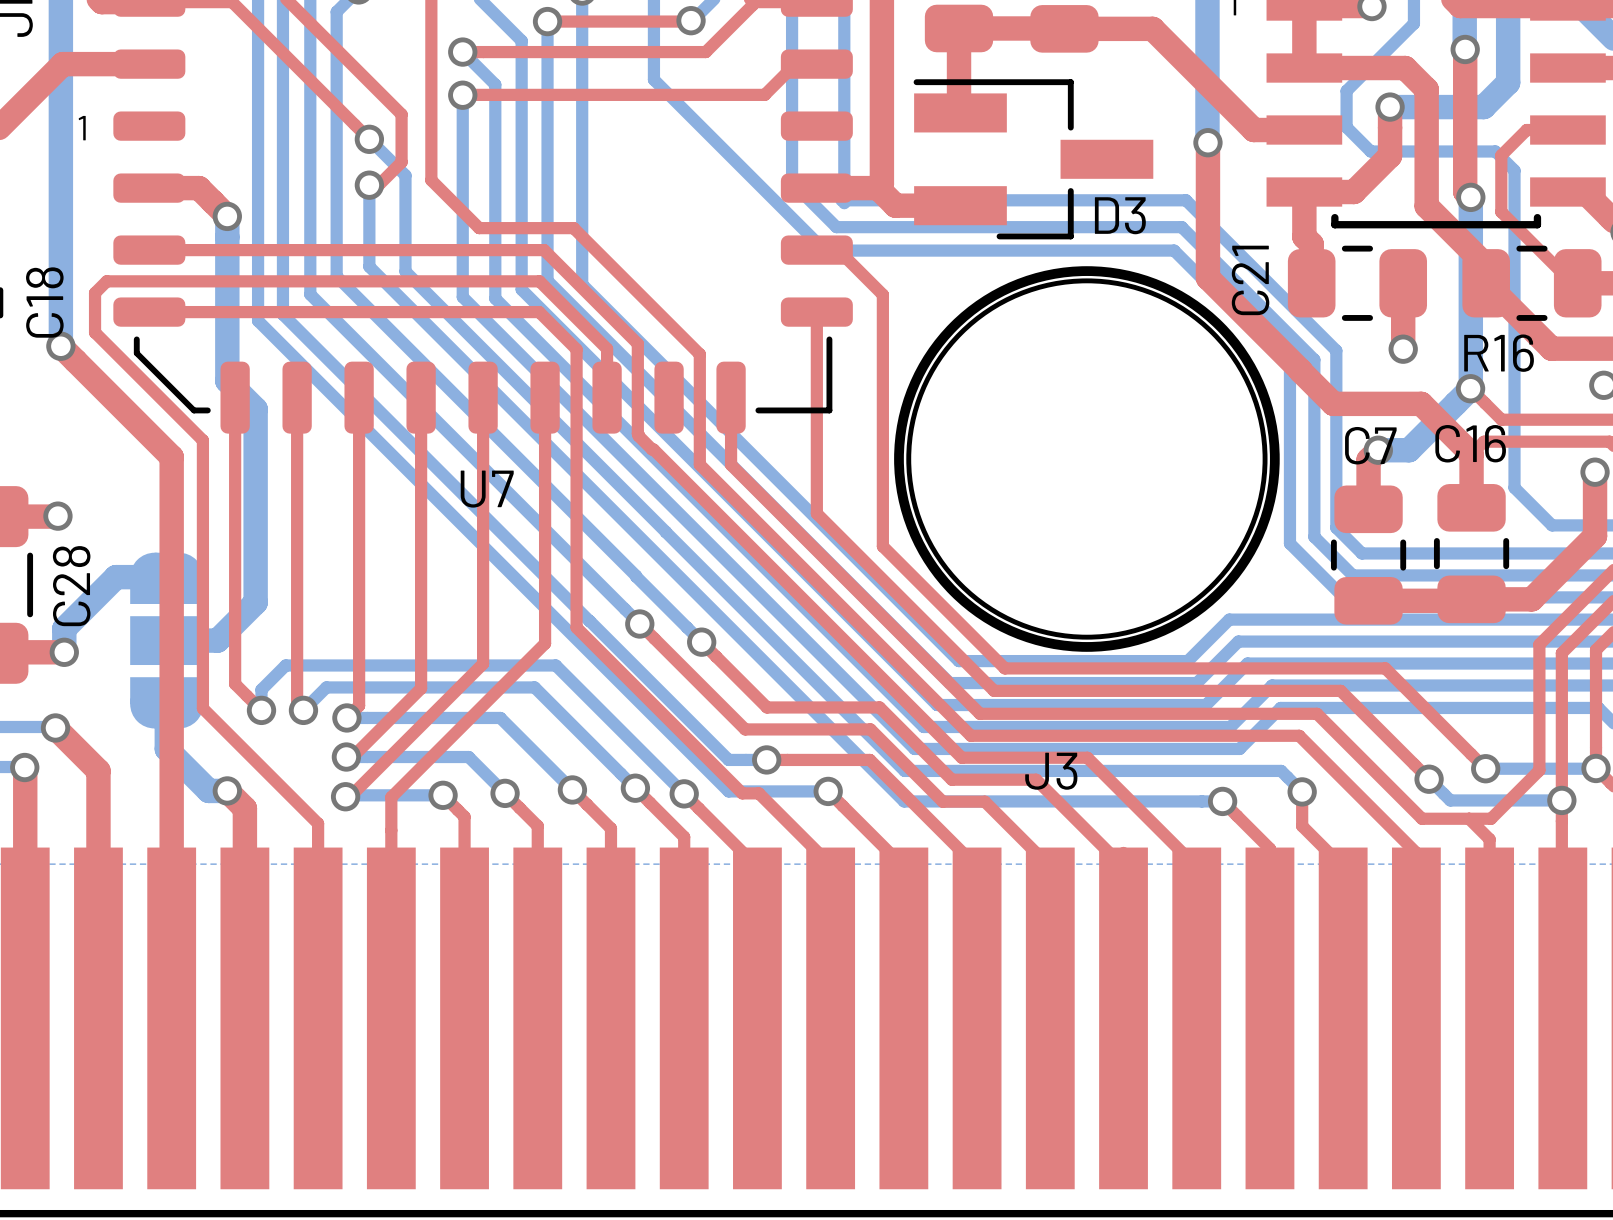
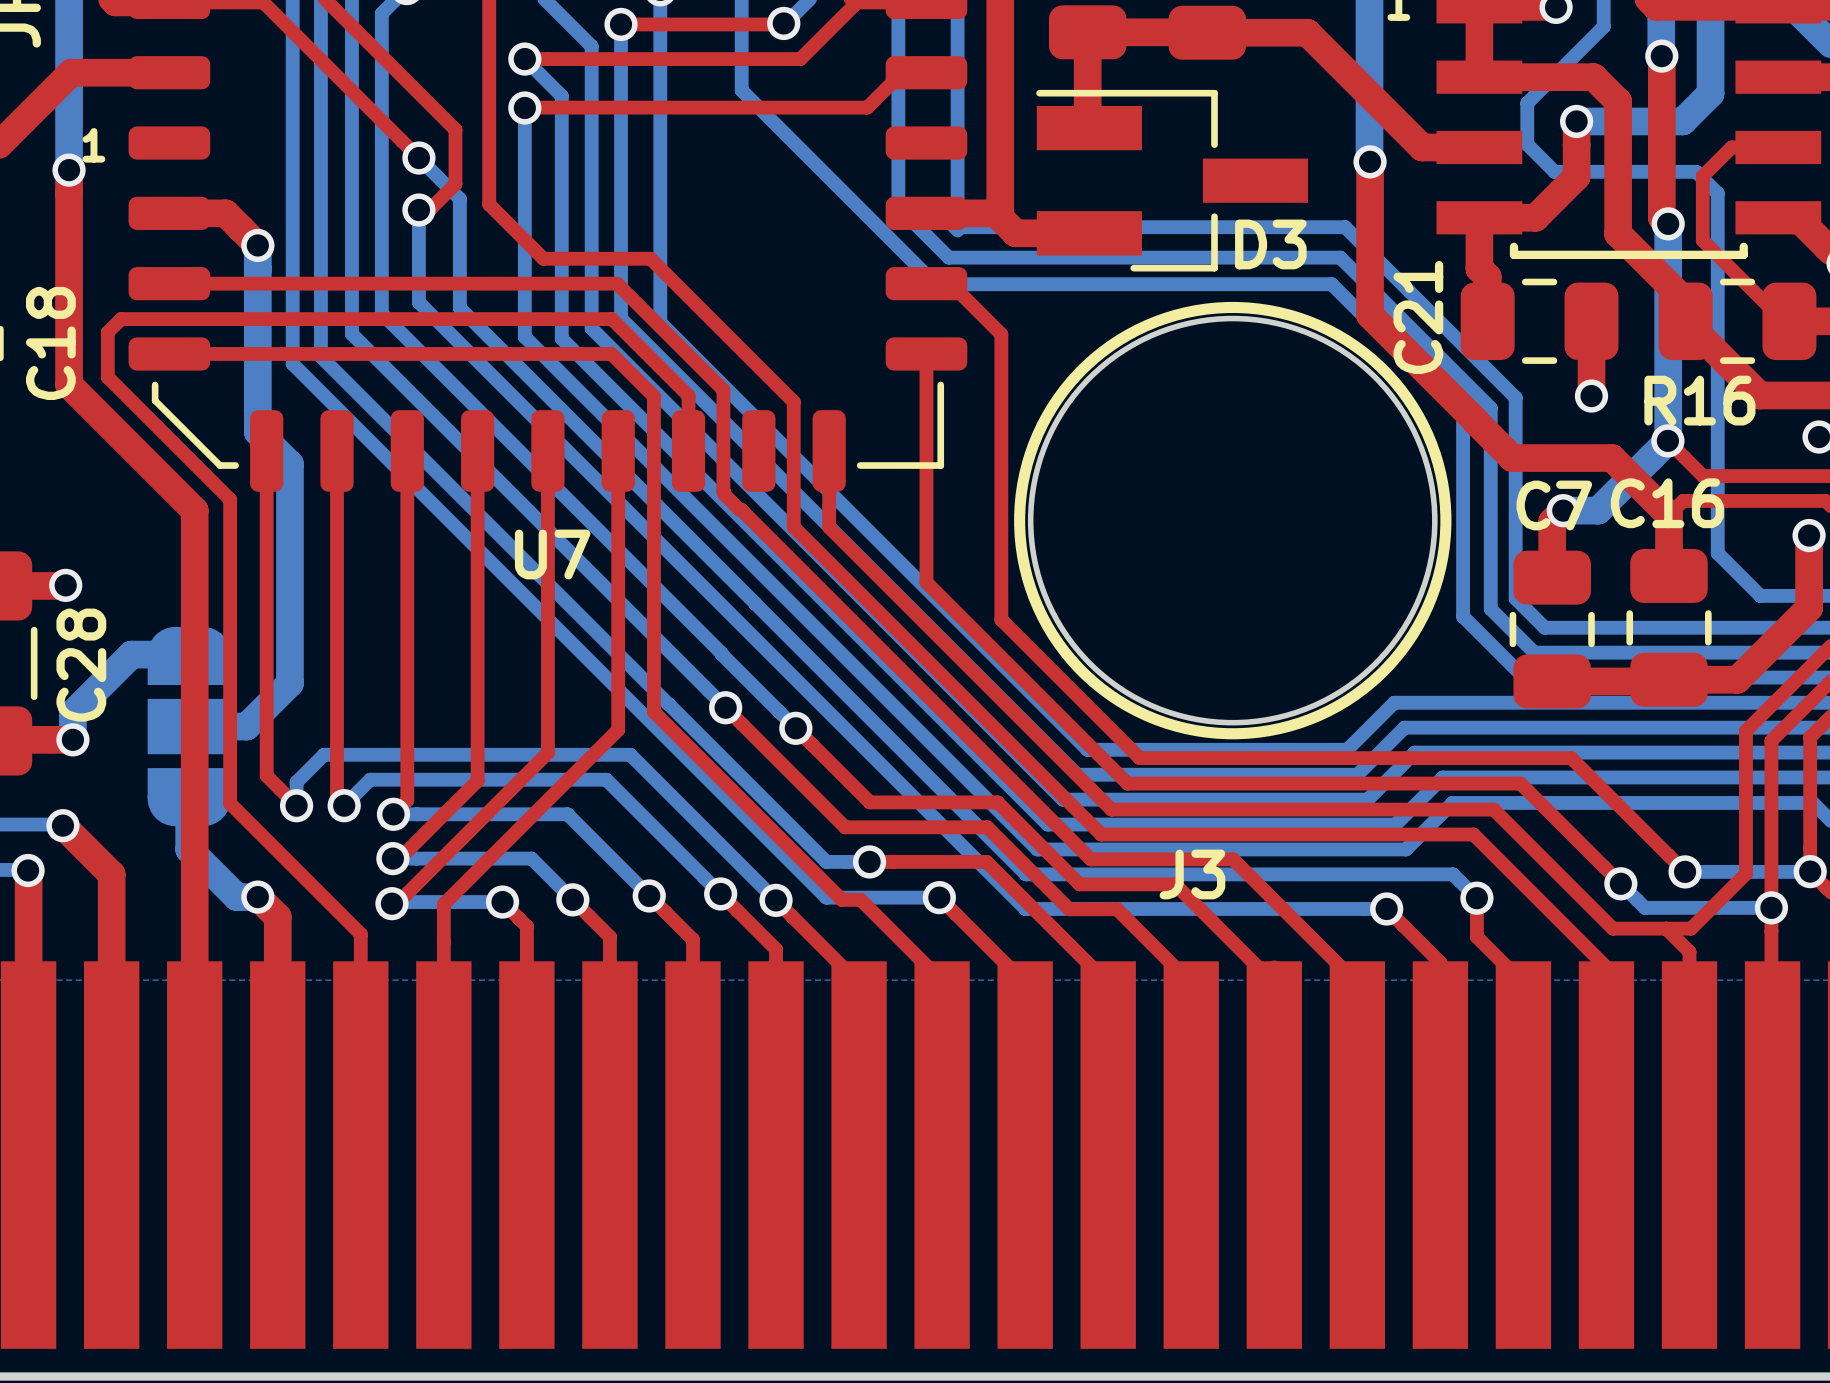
top track: (60, 346) (171, 457) -> (69, 170) (69, 384) (194, 510) (194, 518)
via position: (60, 346) -> (69, 170)

